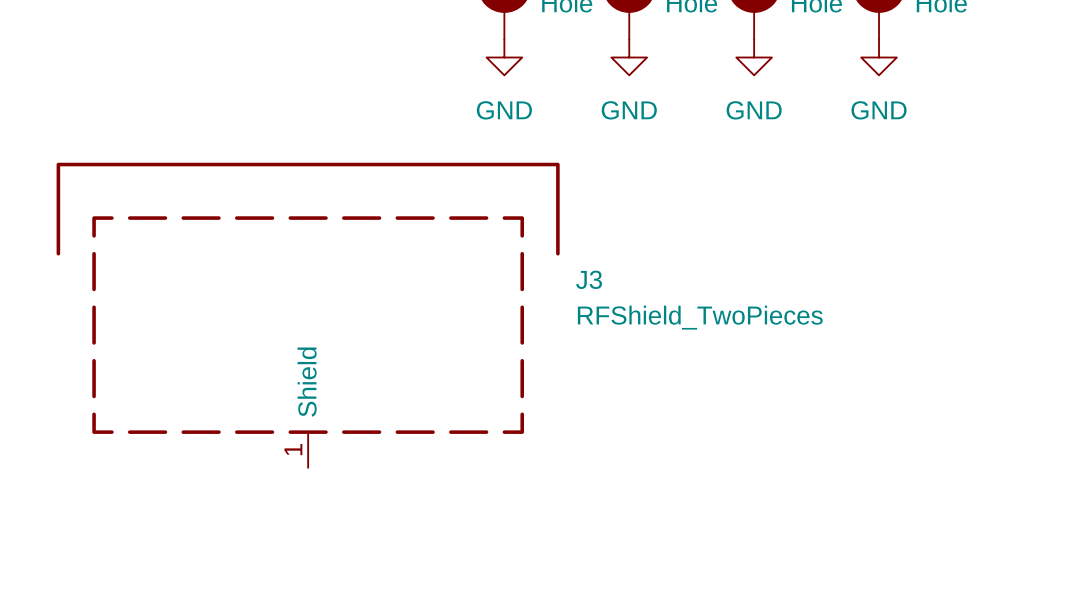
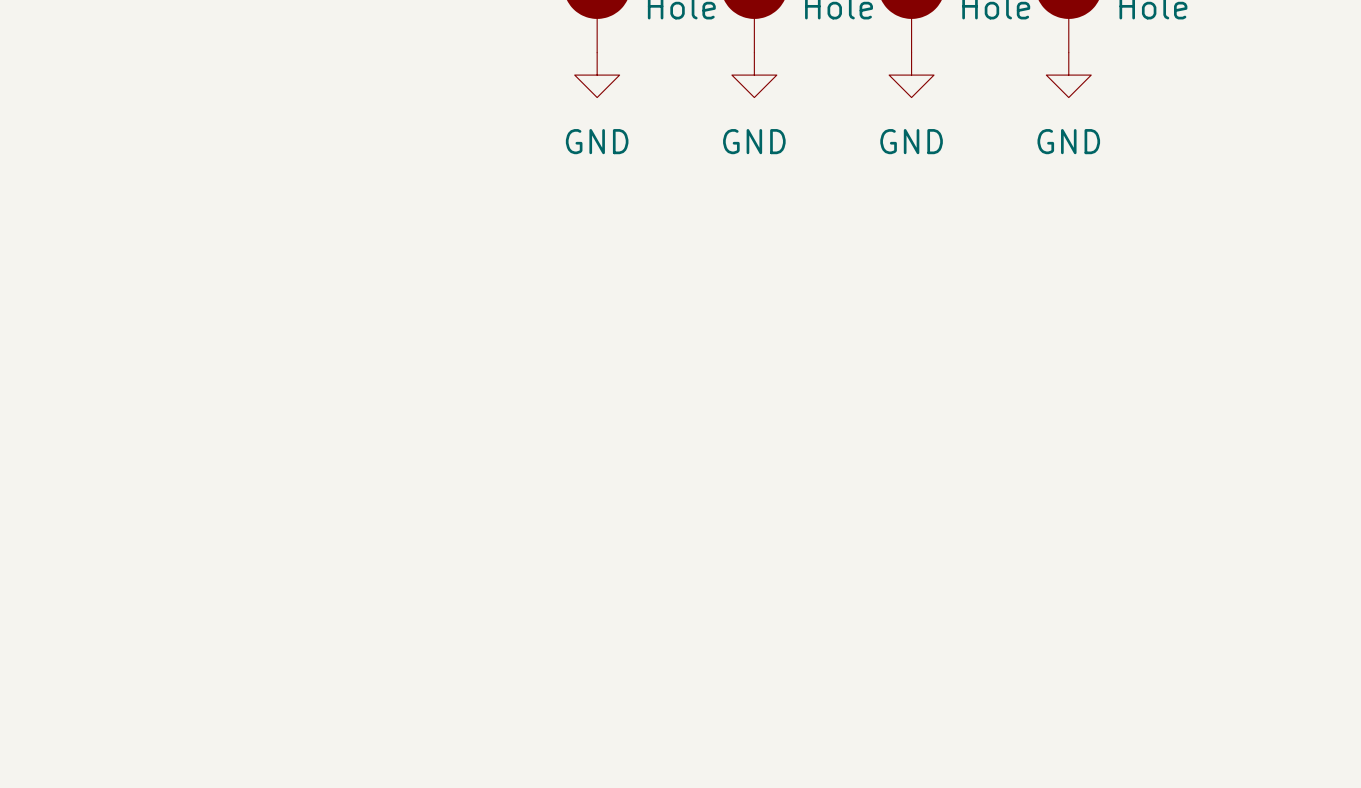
J3: RFShield_TwoPieces (308, 315) -> none

